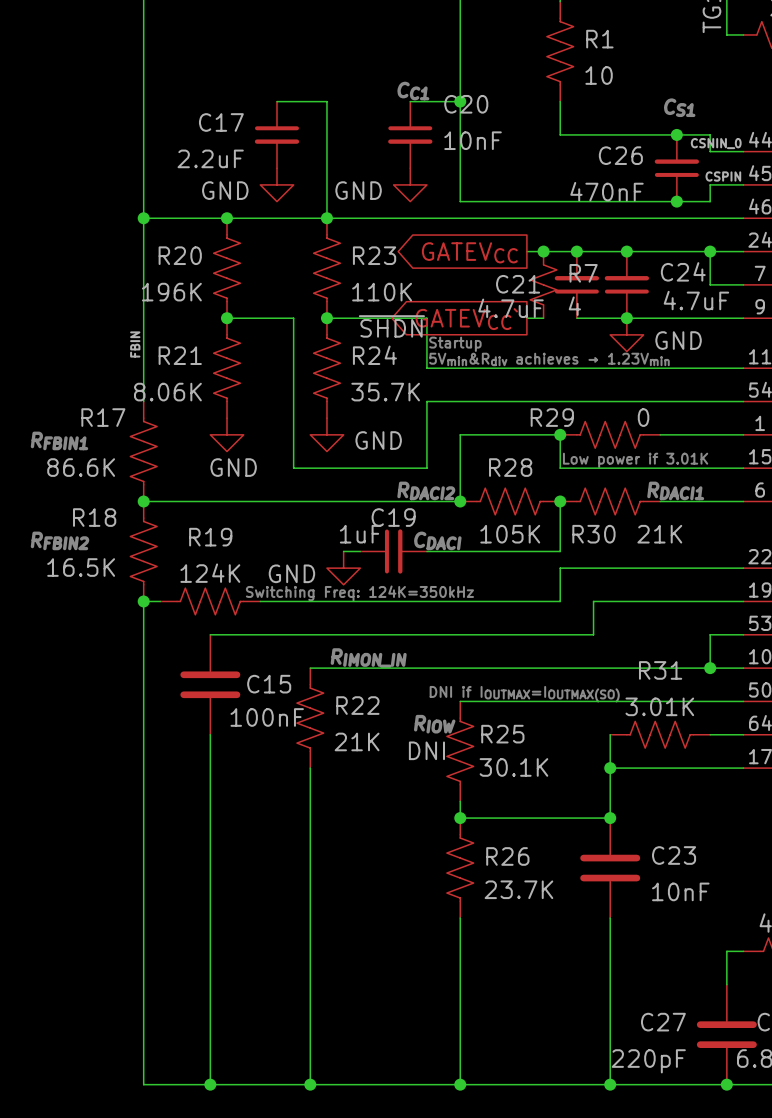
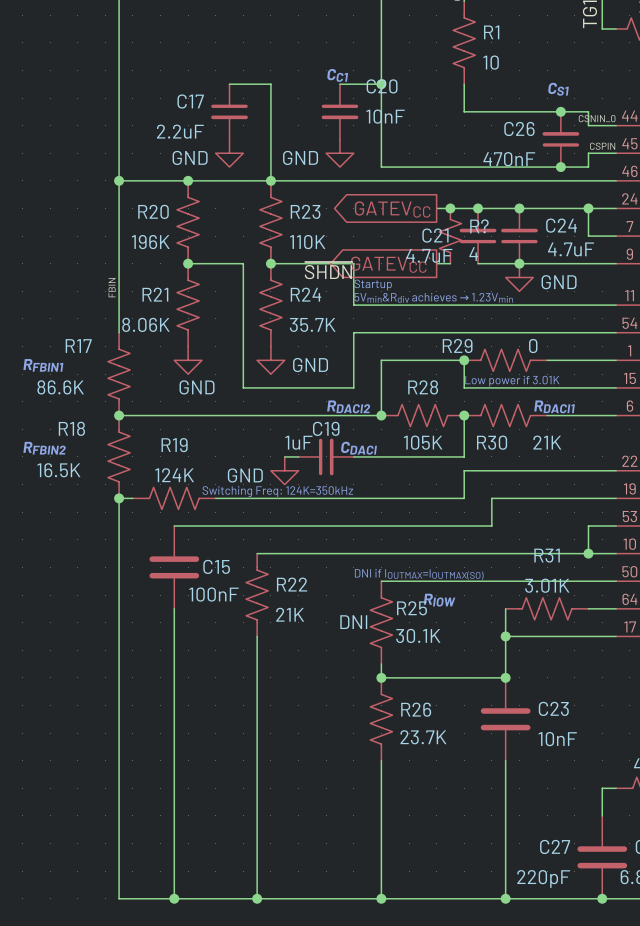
R7 name: R7 (583, 273) -> R? (479, 226)
text: RIMON_IN (368, 658) -> none
text position: RIOW (434, 724) -> RIOW (439, 600)

